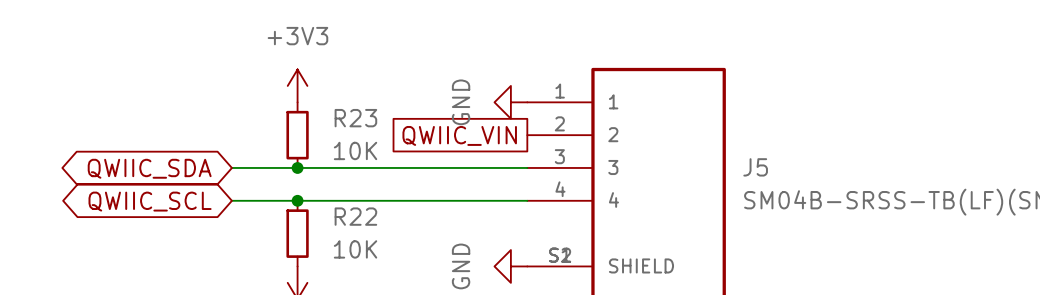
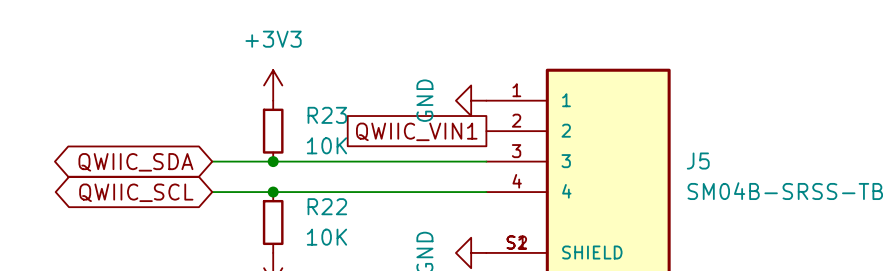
global label: QWIIC_VIN (459, 135) -> QWIIC_VIN1 (416, 131)

